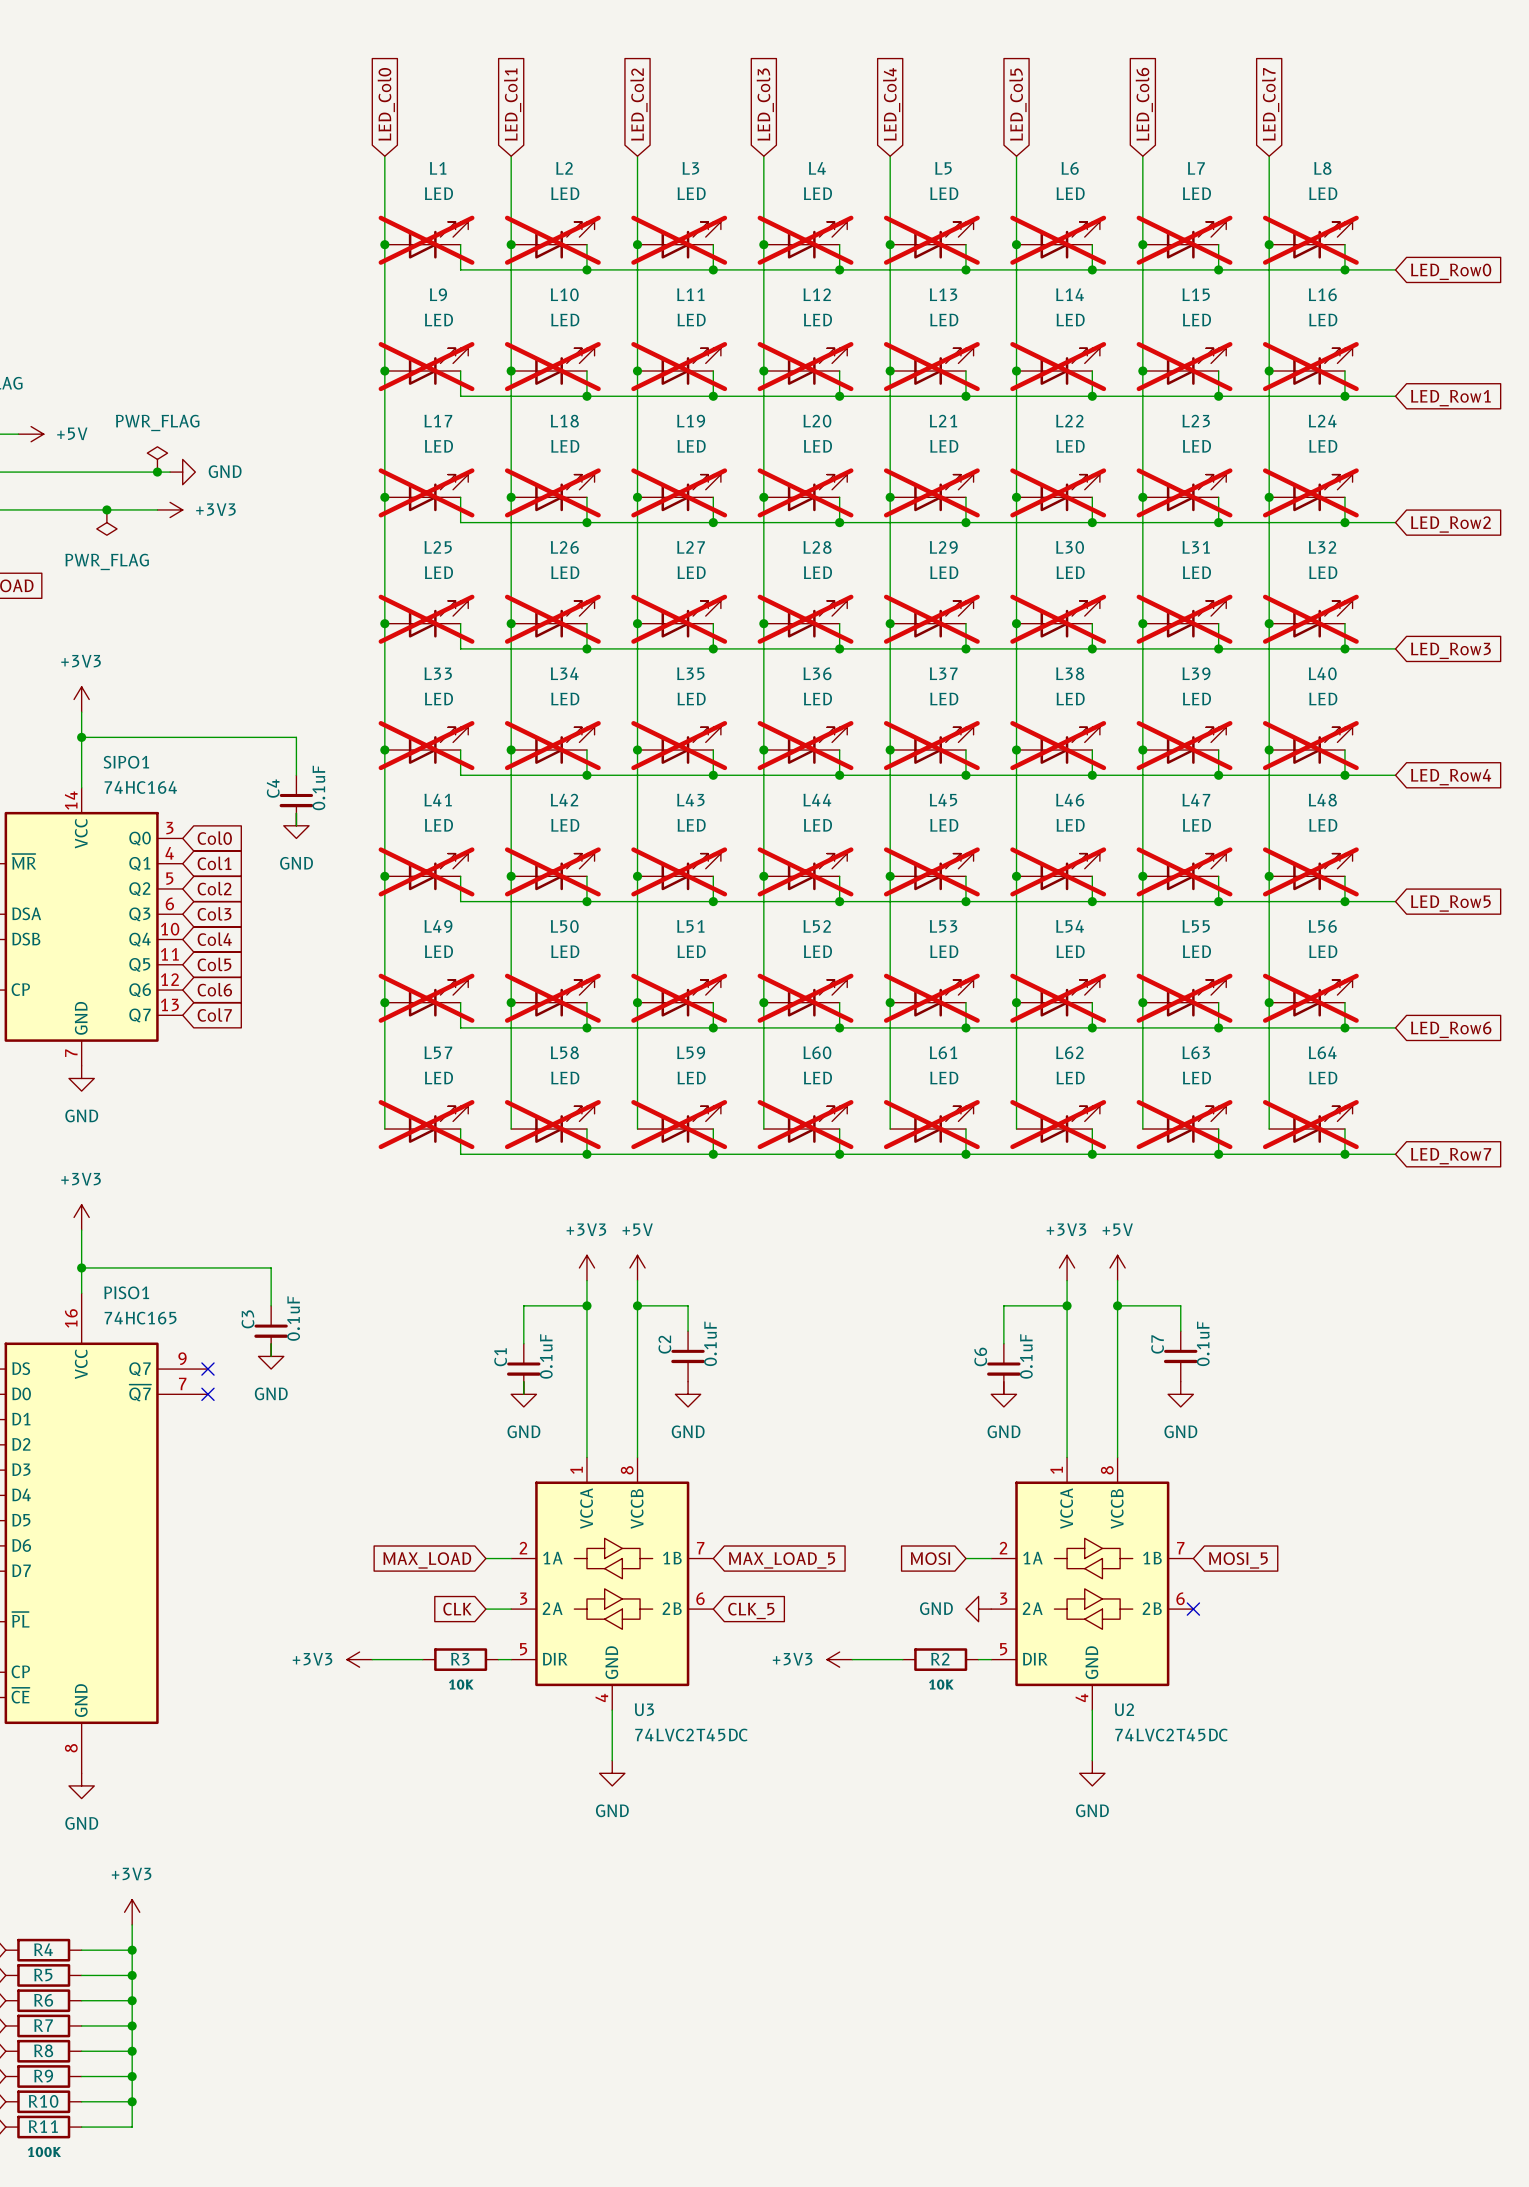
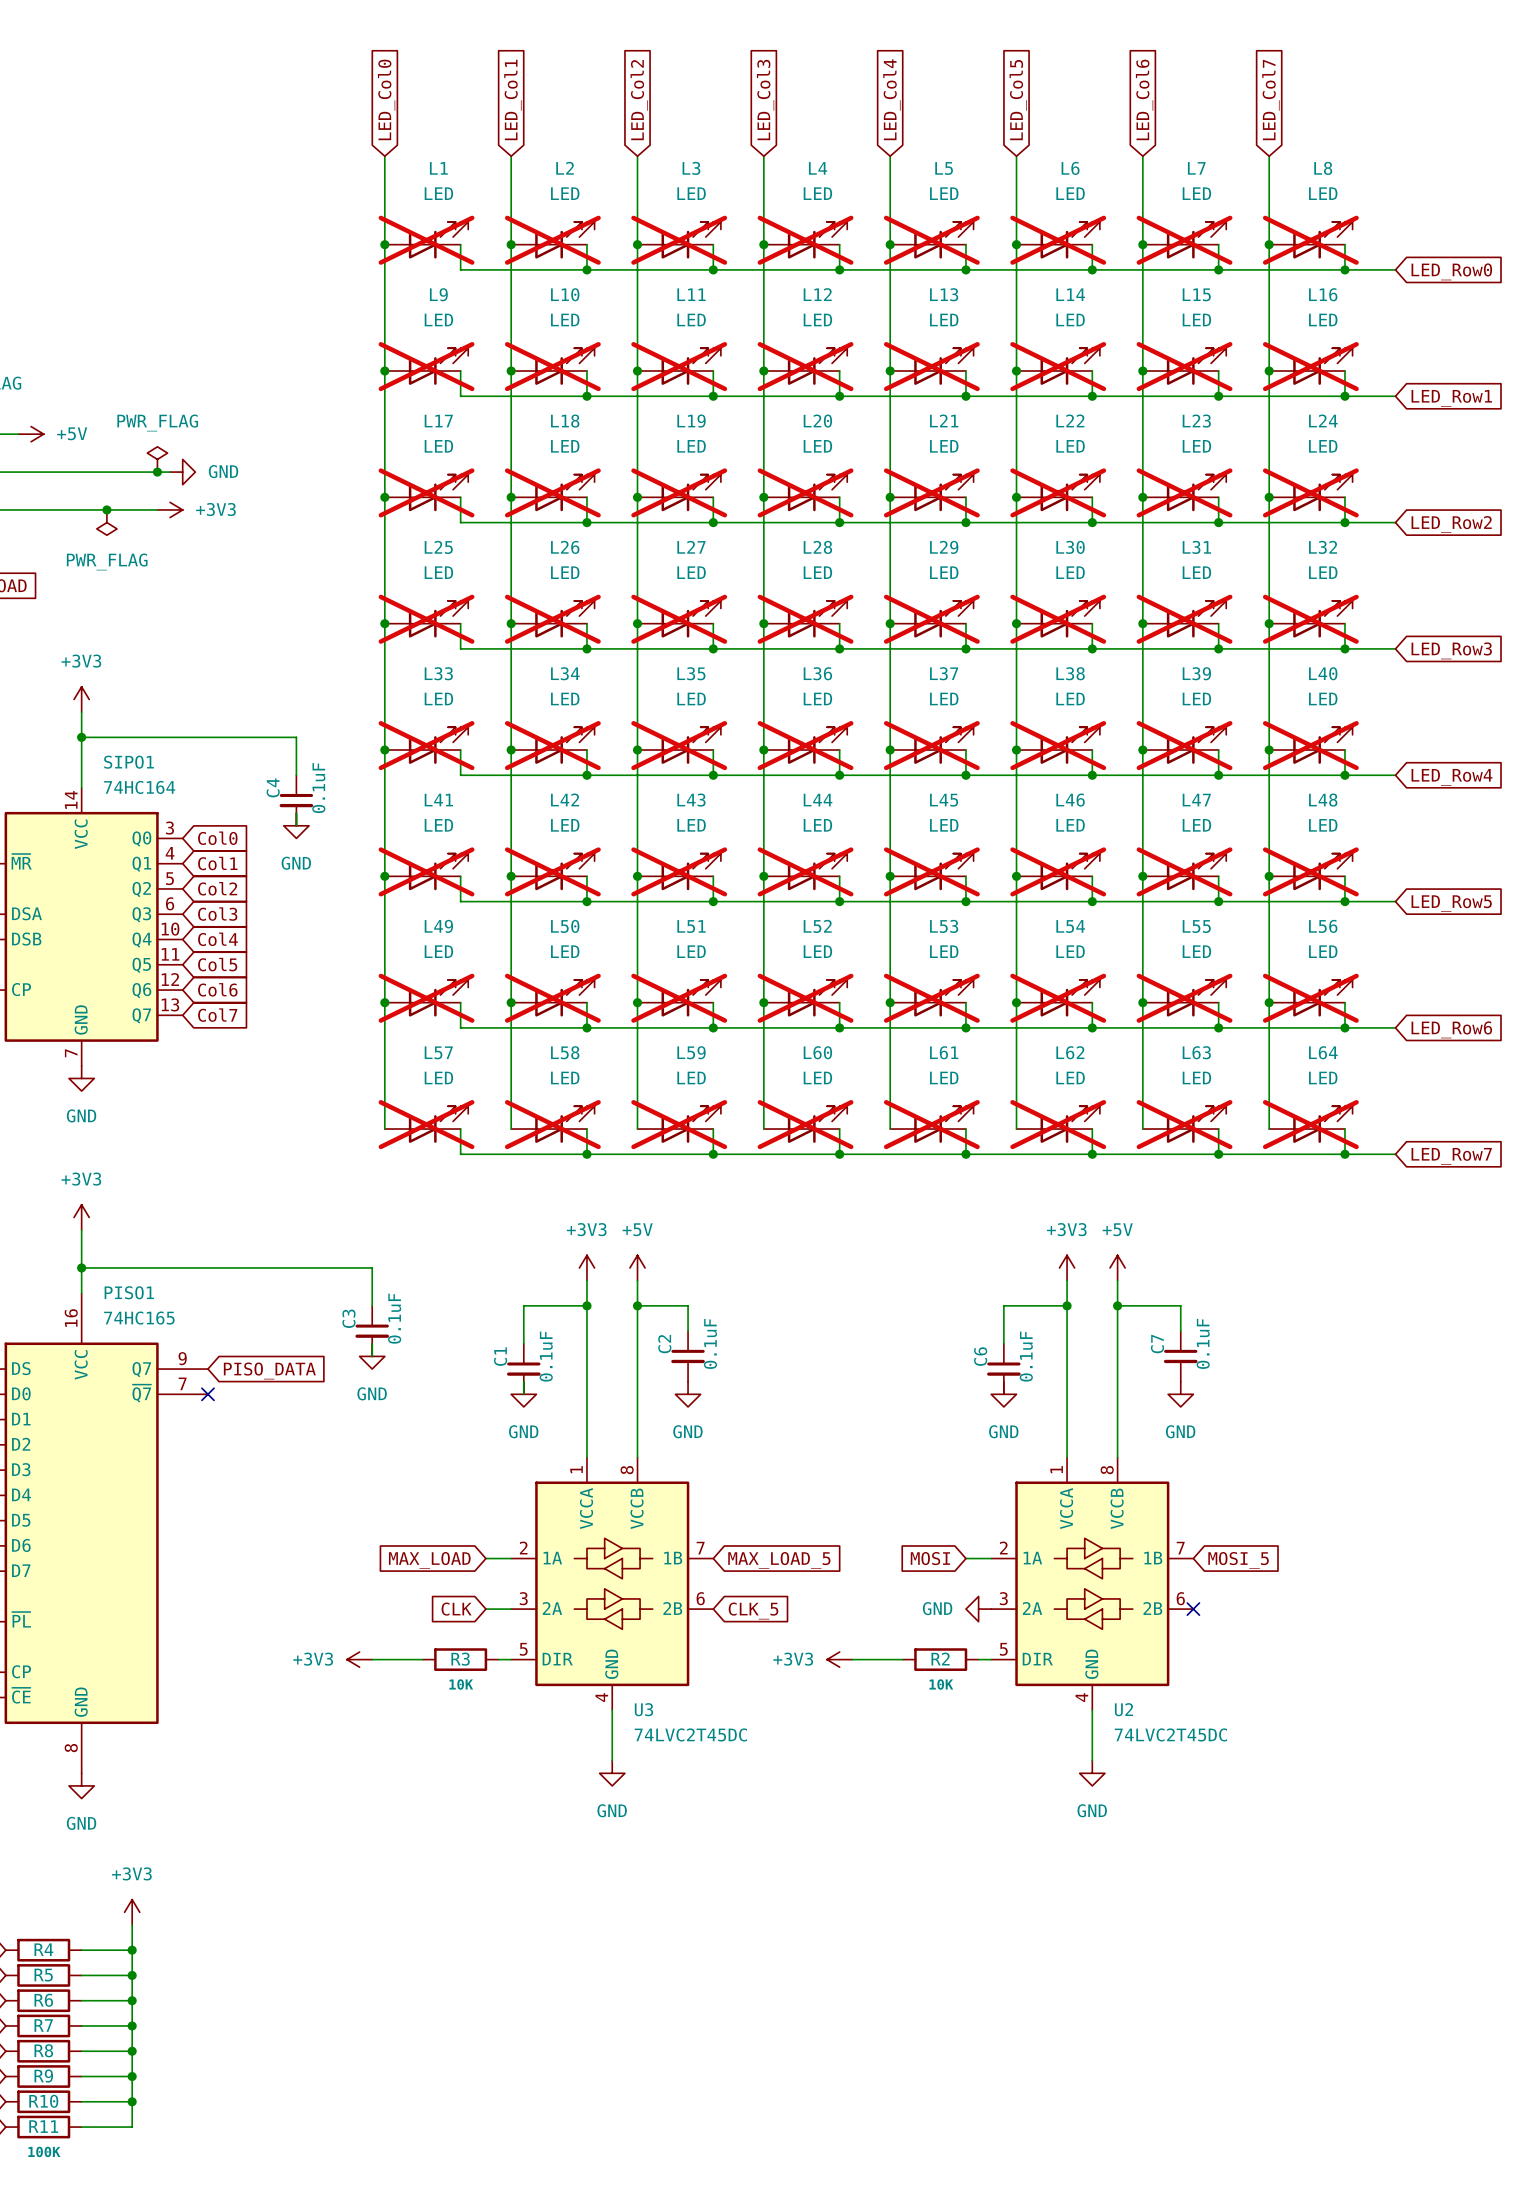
wire: (271, 1267) (271, 1305) -> (271, 1267) (372, 1267) (372, 1305)
C3 position: (271, 1331) -> (372, 1331)
wire: (271, 1343) (271, 1356) -> (372, 1343) (372, 1356)
power symbol position: GND (271, 1356) -> GND (372, 1356)
no-connect mark: (207, 1369) -> none
global label: none -> PISO_DATA (269, 1370)

